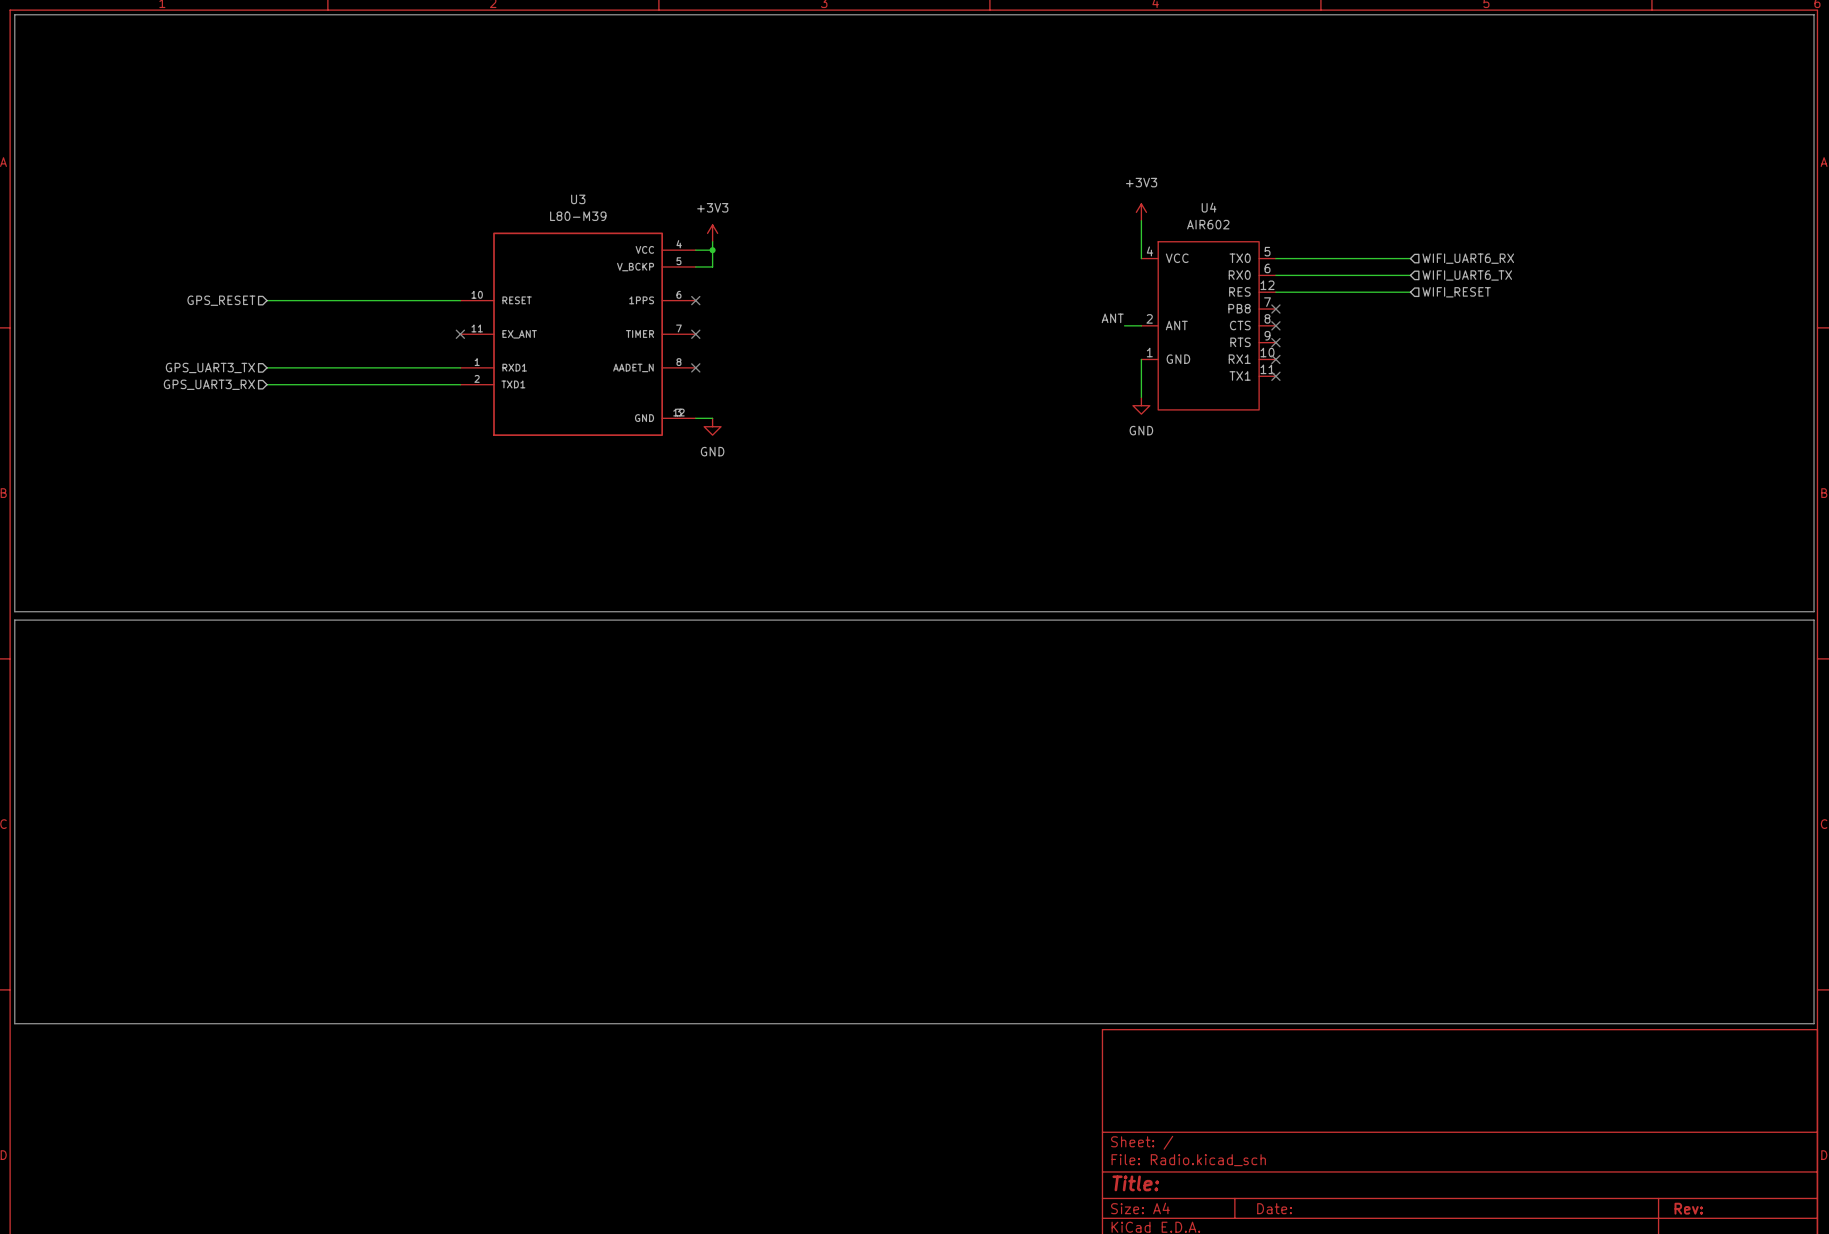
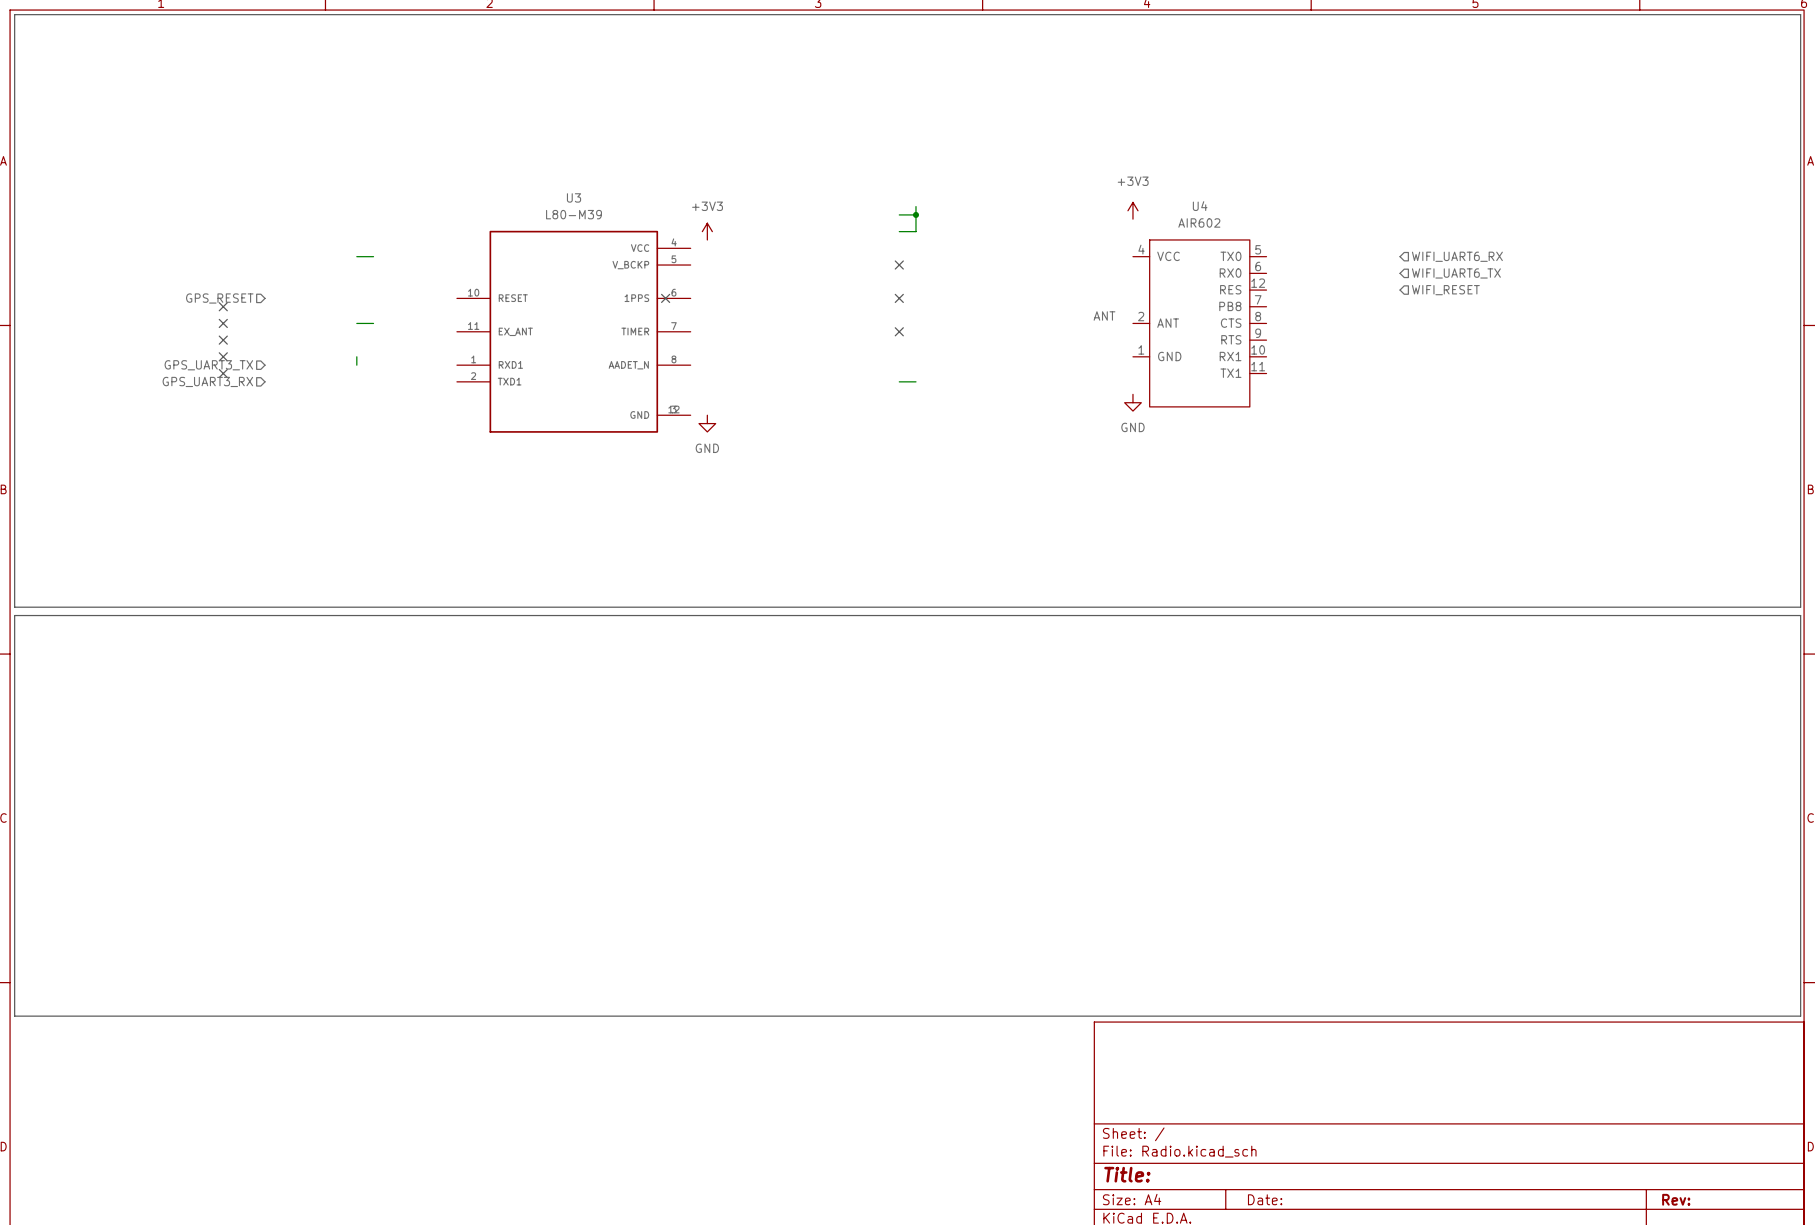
wire: none -> (915, 206) (915, 231) (899, 231)
wire: none -> (899, 214) (915, 214)
junction: none -> (915, 214)
wire: (1141, 220) (1141, 258) -> none
wire: (712, 241) (712, 266) (695, 266) -> none
wire: (695, 250) (712, 250) -> none
junction: (712, 250) -> none
wire: none -> (356, 256) (373, 256)
wire: (1275, 258) (1410, 258) -> none
no-connect mark: none -> (899, 265)
wire: (1275, 275) (1410, 275) -> none
wire: (1275, 292) (1410, 292) -> none
wire: (266, 300) (460, 300) -> none
no-connect mark: none -> (665, 298)
no-connect mark: (695, 300) -> none
no-connect mark: none -> (899, 298)
no-connect mark: none -> (223, 306)
no-connect mark: (1275, 309) -> none
no-connect mark: none -> (223, 323)
wire: none -> (356, 323) (373, 323)
wire: (1124, 325) (1141, 325) -> none
no-connect mark: (1275, 325) -> none
no-connect mark: (460, 334) -> none
no-connect mark: (695, 334) -> none
no-connect mark: none -> (899, 331)
no-connect mark: none -> (223, 340)
no-connect mark: (1275, 342) -> none
no-connect mark: none -> (223, 356)
wire: none -> (356, 356) (356, 365)
wire: (1141, 359) (1141, 397) -> none
no-connect mark: (1275, 359) -> none
wire: (266, 367) (460, 367) -> none
no-connect mark: (695, 367) -> none
no-connect mark: none -> (223, 373)
no-connect mark: (1275, 376) -> none
wire: (266, 384) (460, 384) -> none
wire: none -> (899, 381) (915, 381)
wire: (695, 418) (712, 418) -> none

